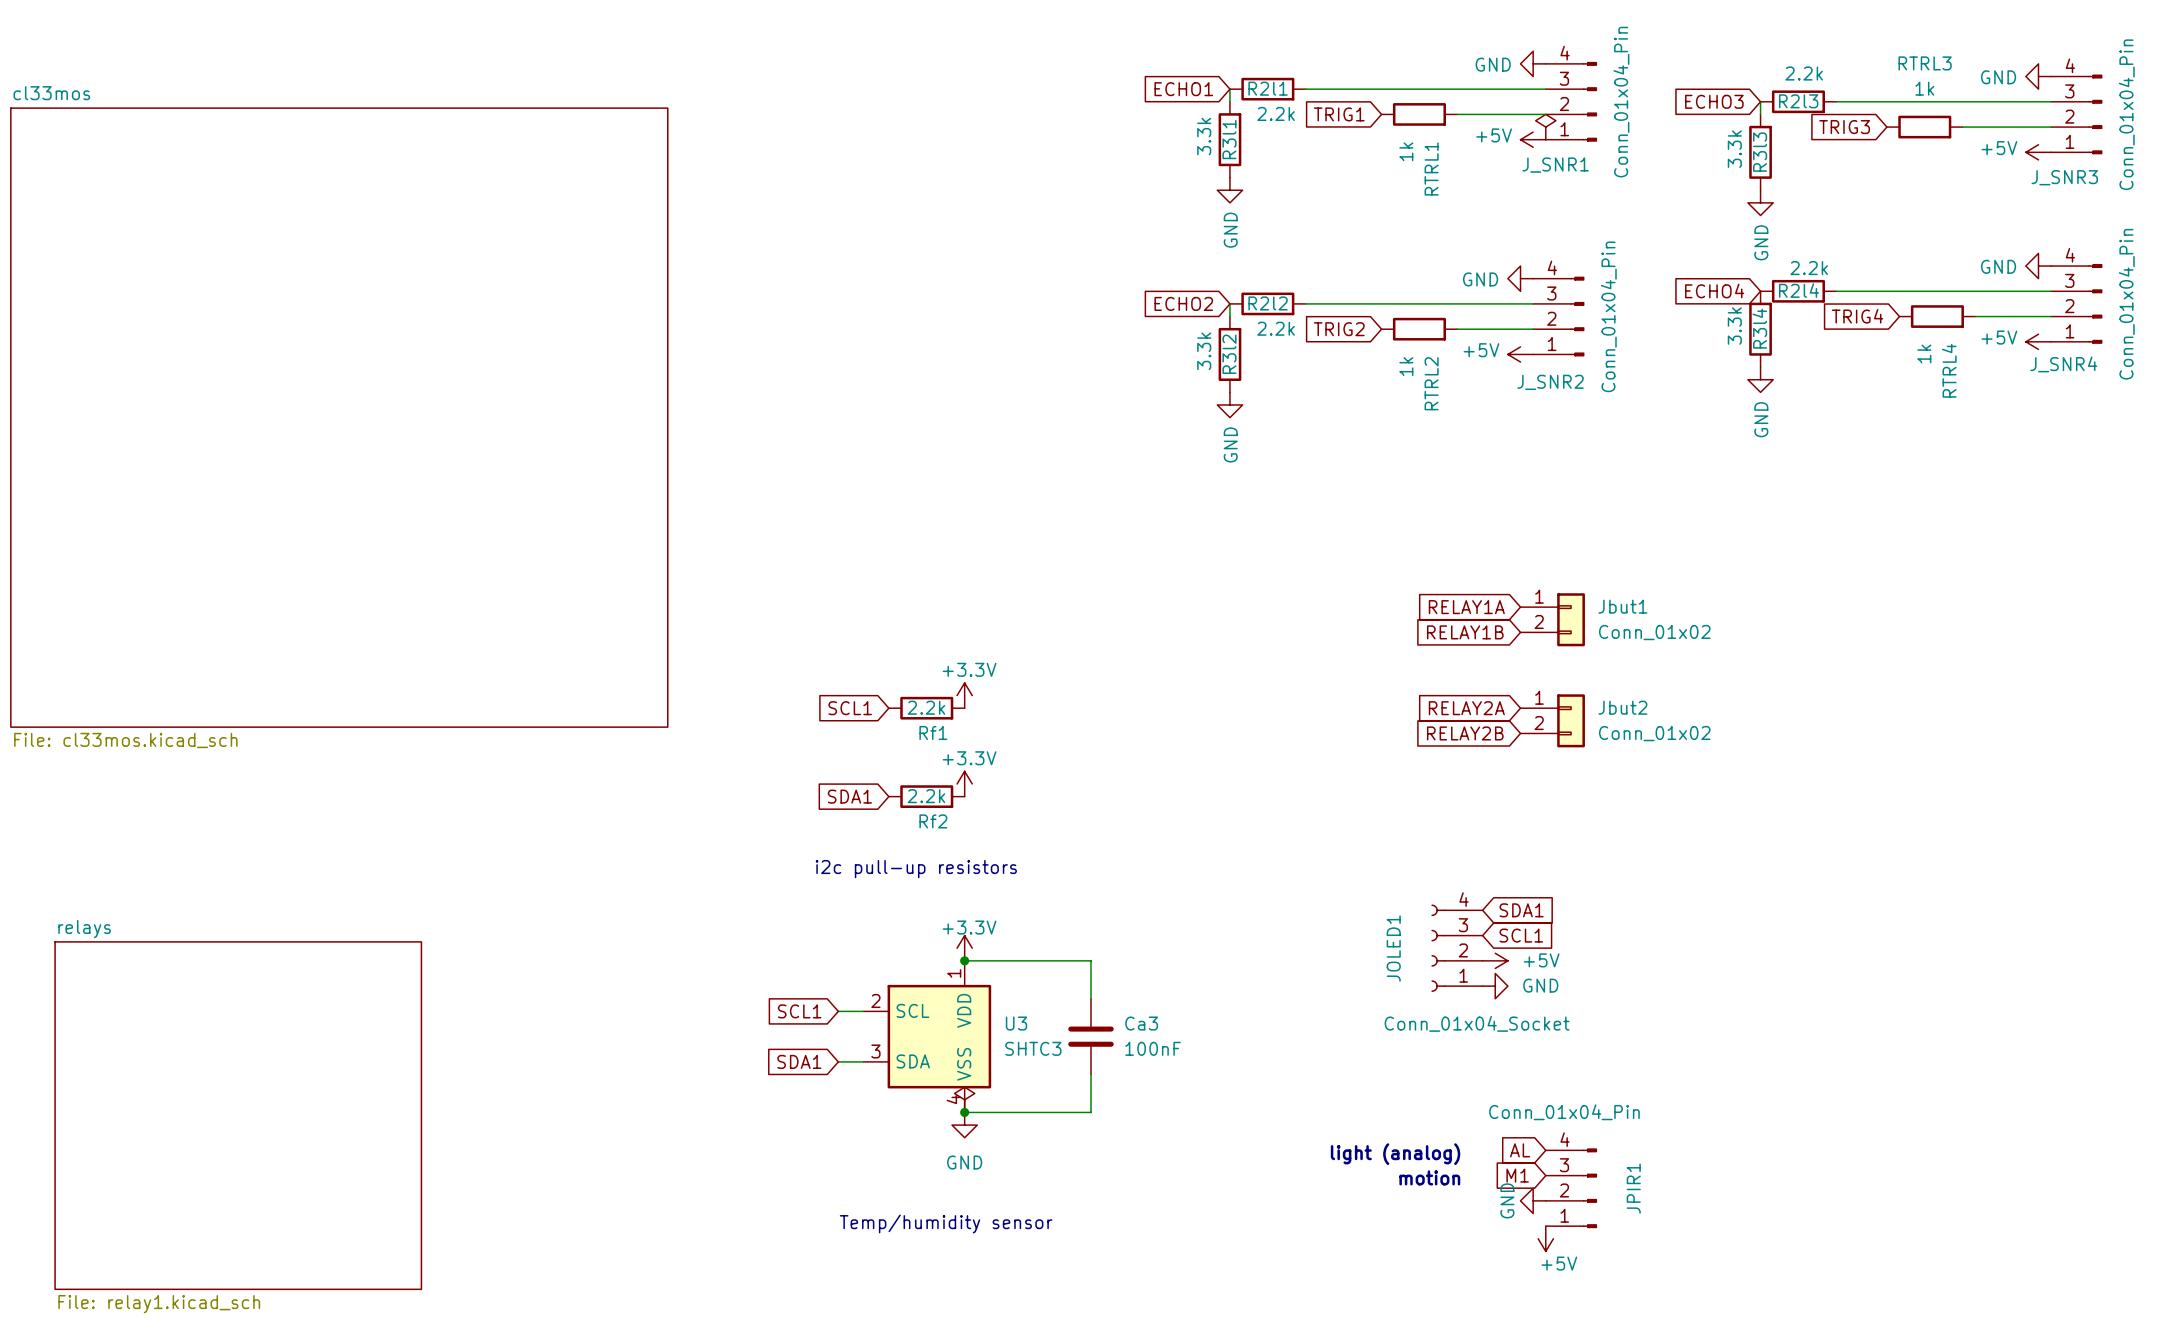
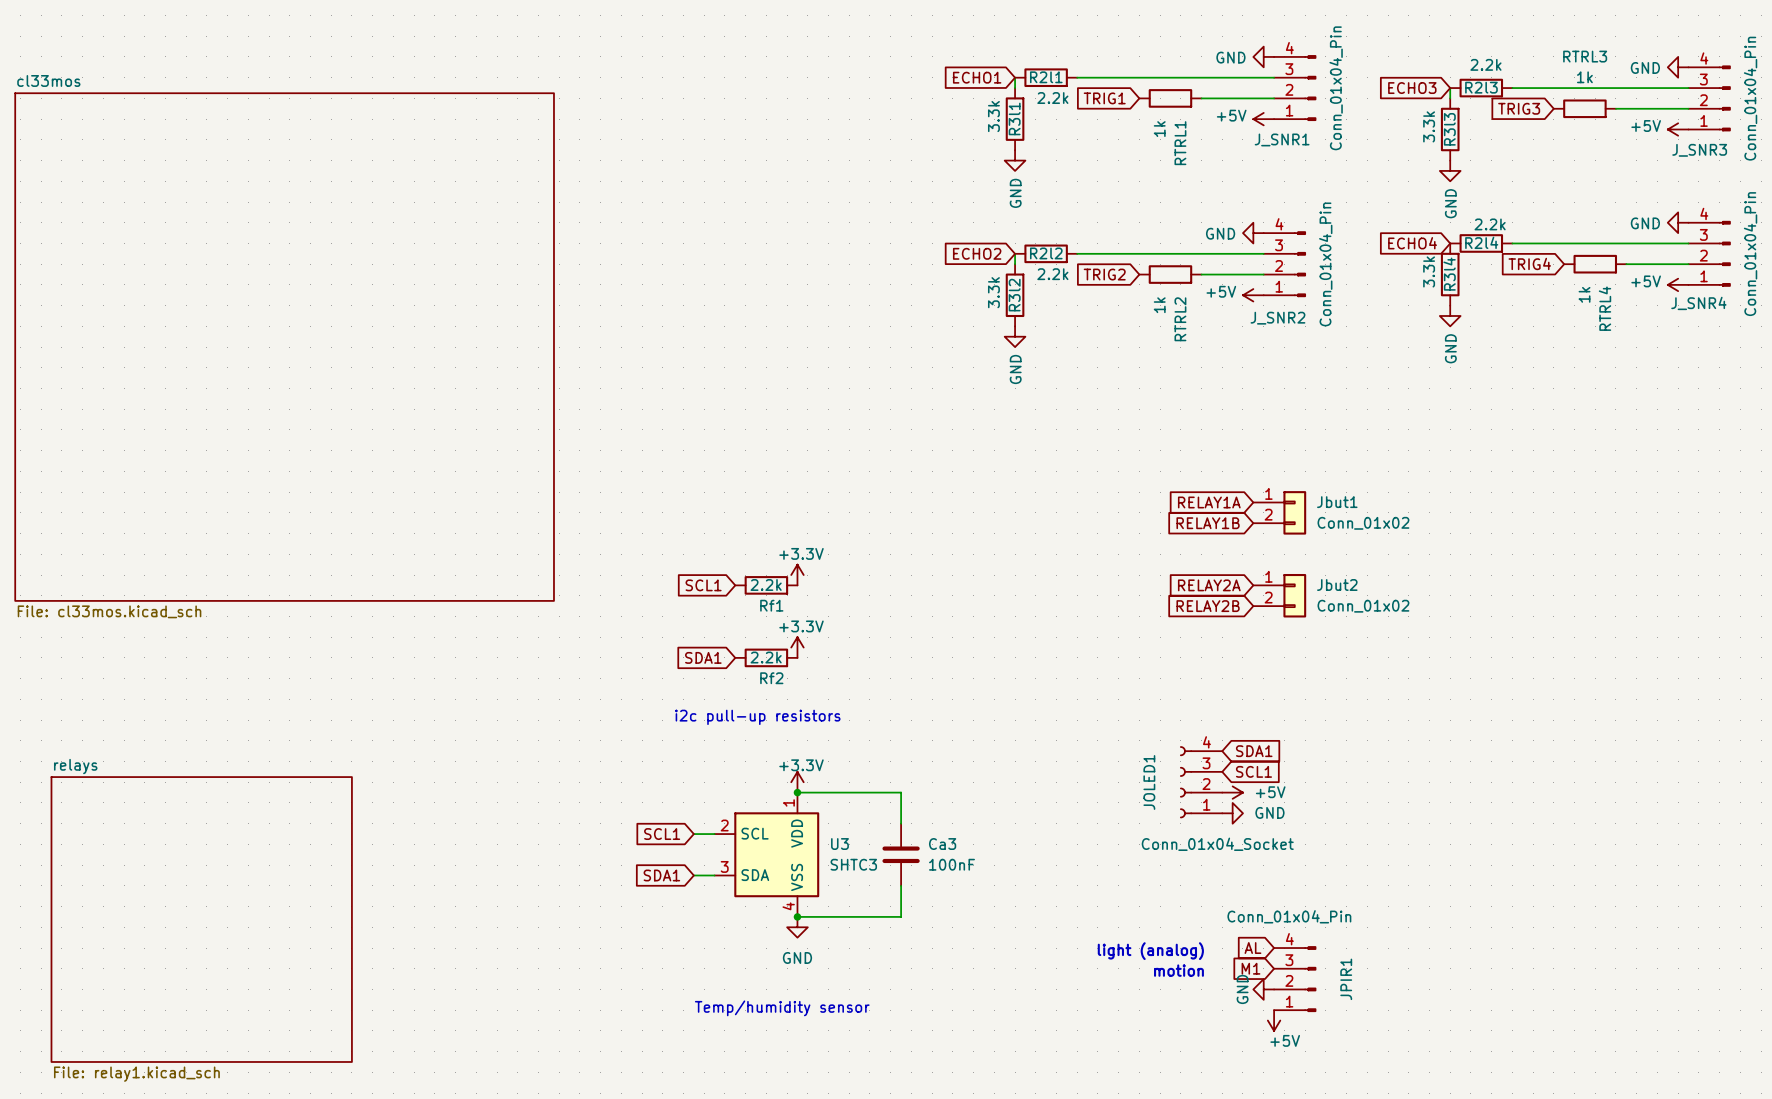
power symbol: (1545, 127) -> none
power symbol: (964, 1099) -> none

